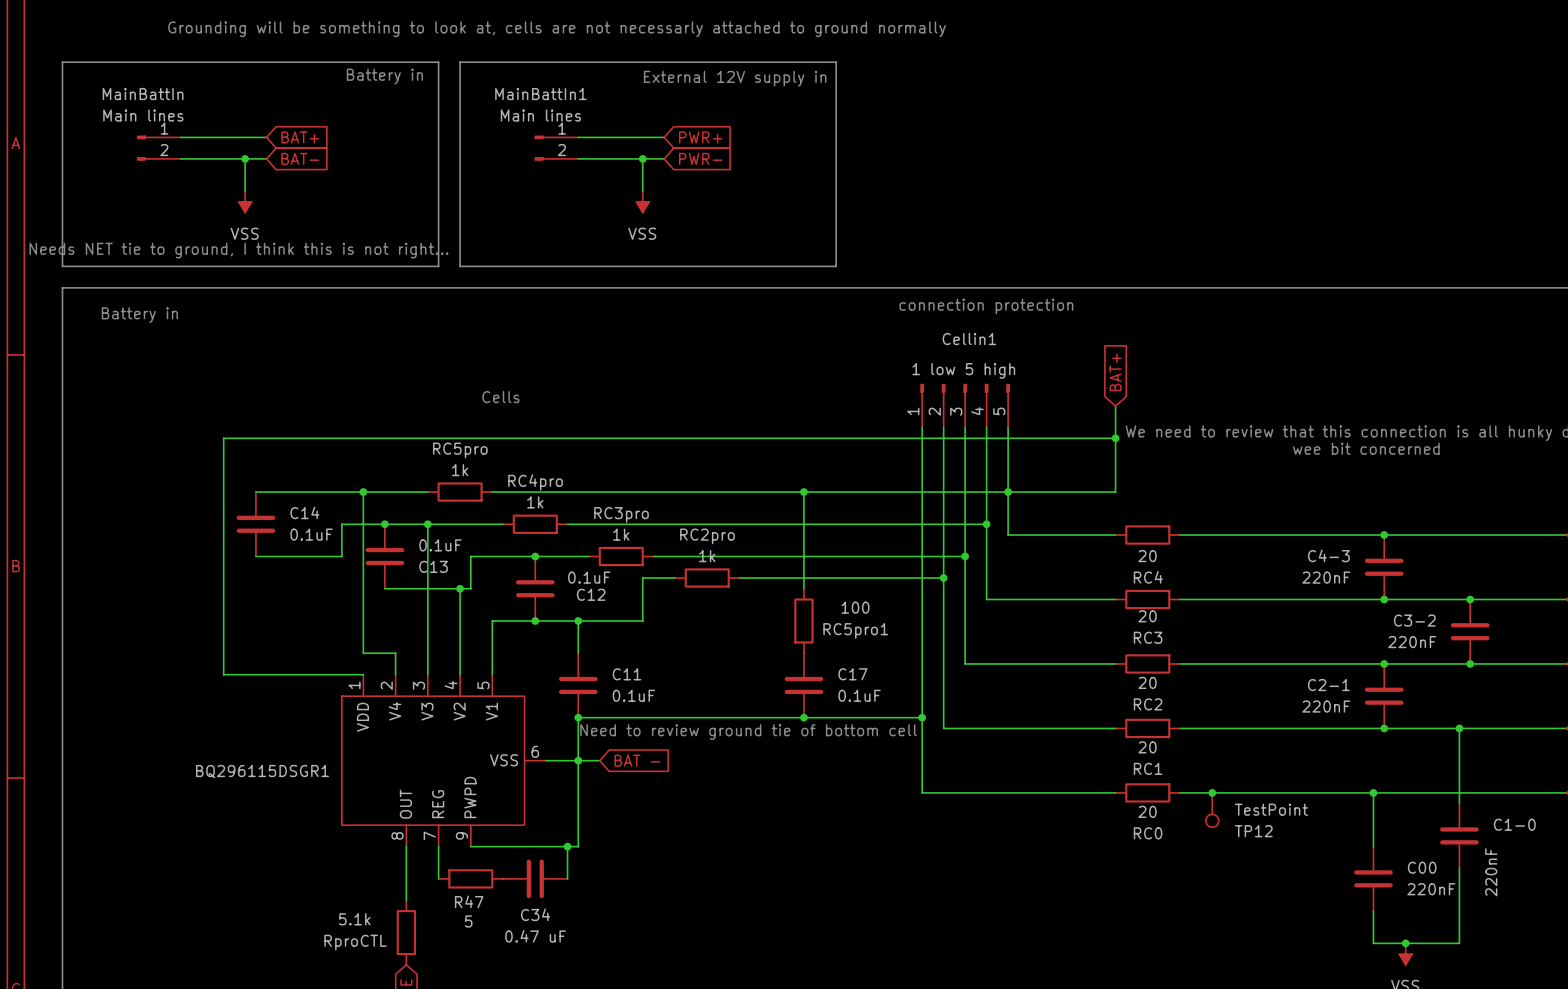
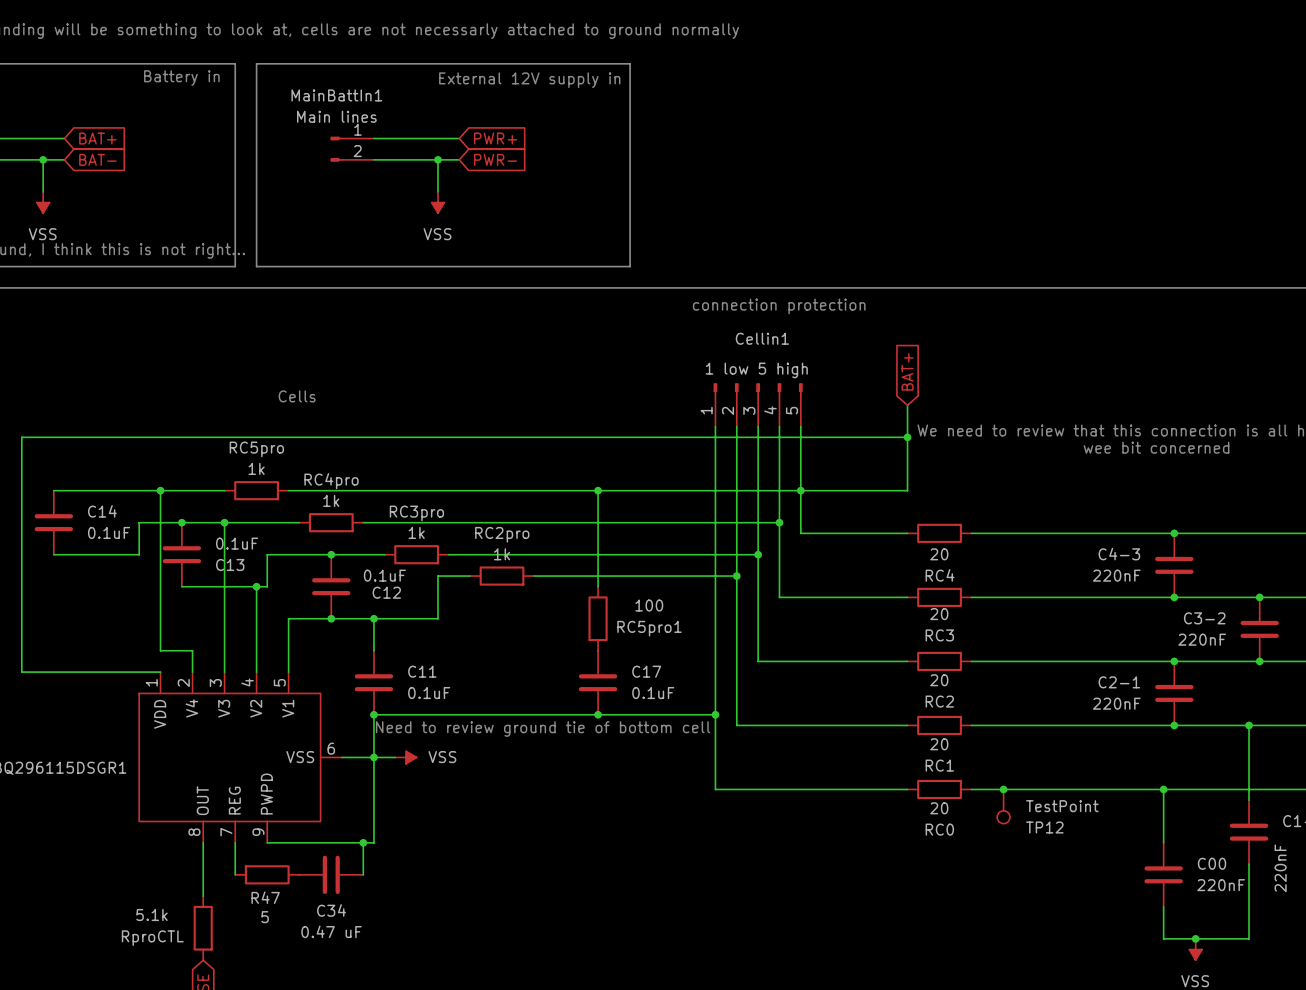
power symbol: none -> VSS (405, 757)
global label: BAT - (637, 760) -> none

